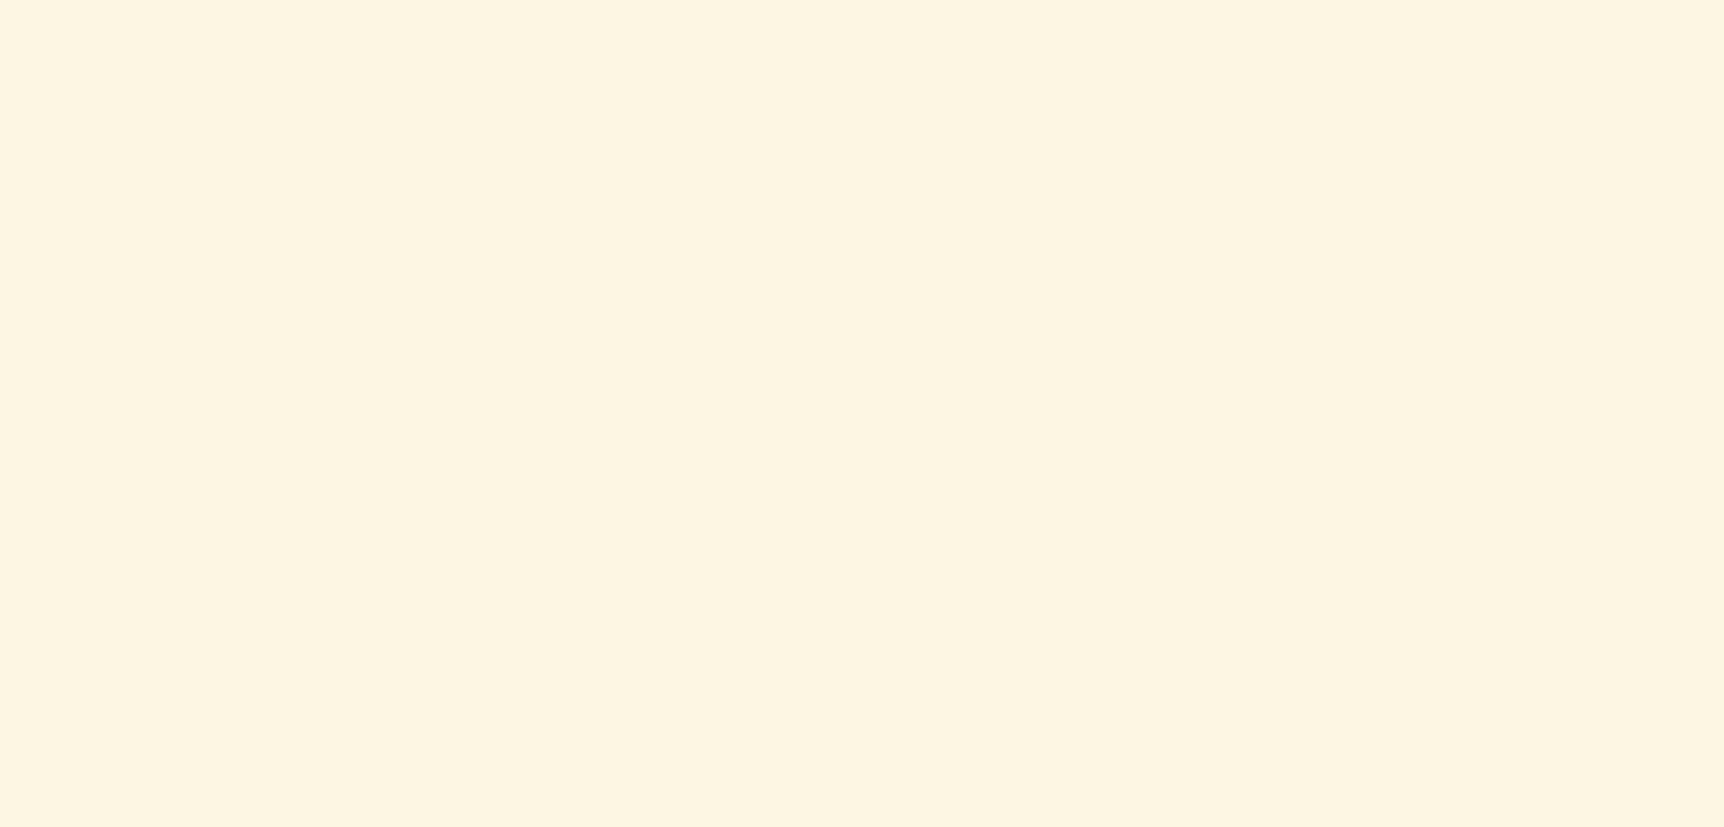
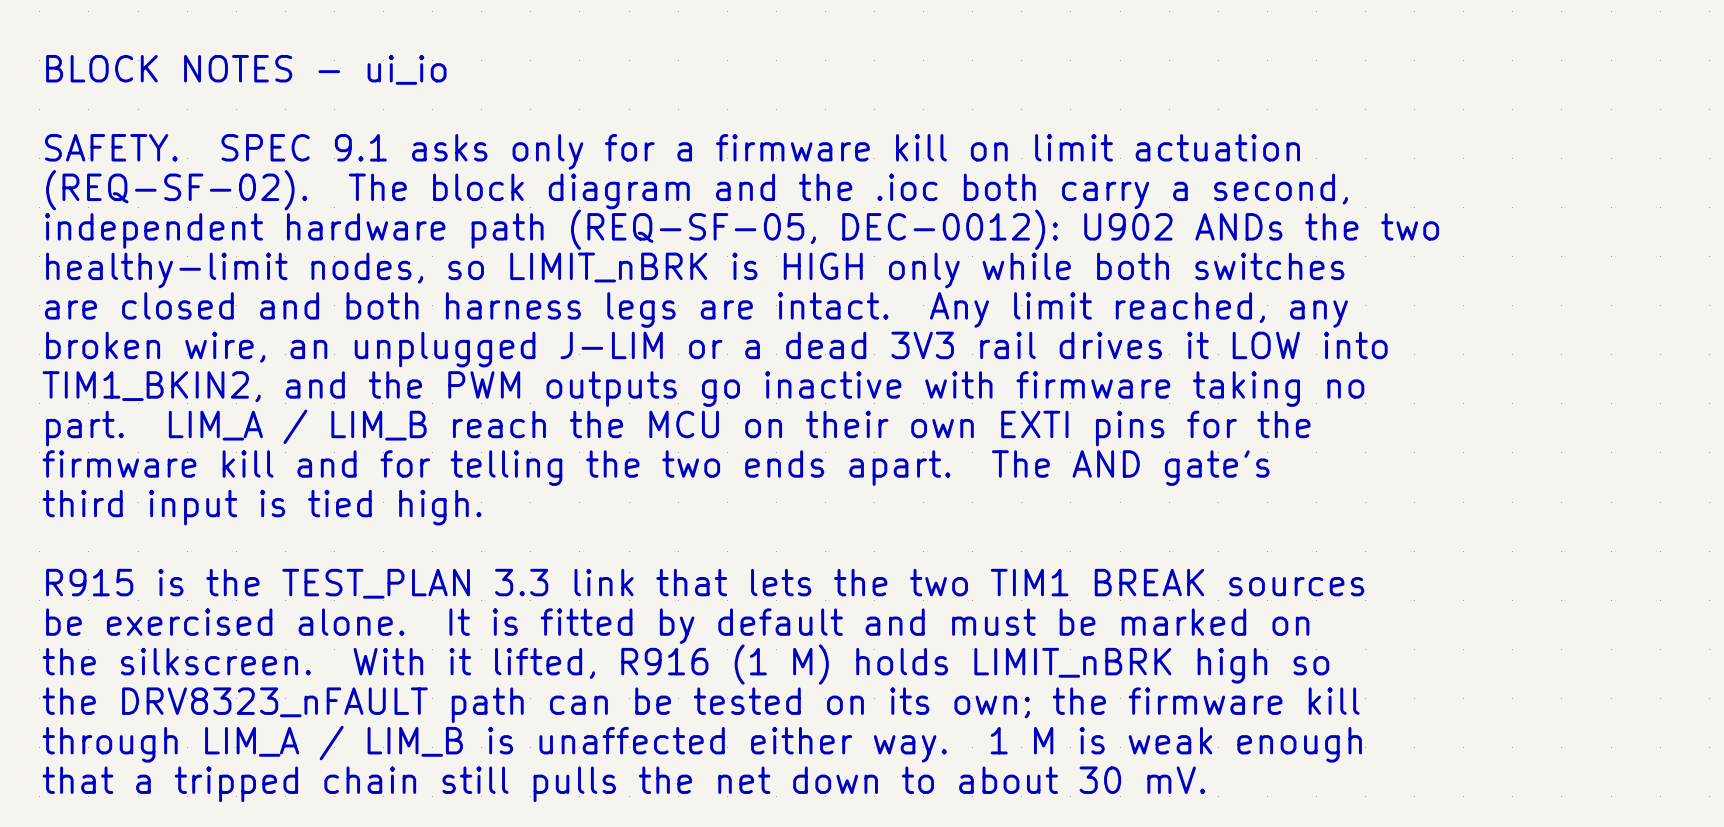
text: none -> BLOCK NOTES - ui_io (246, 69)
text: none -> SAFETY. SPEC 9.1 asks only for a firmware kill on limit actuation (672, 151)
text: none -> (REQ-SF-02). The block diagram and the .ioc both carry a second, (697, 190)
text: none -> independent hardware path (REQ-SF-05, DEC-0012): U902 ANDs the two (742, 229)
text: none -> healthy-limit nodes, so LIMIT_nBRK is HIGH only while both switches (695, 270)
text: none -> are closed and both harness legs are intact. Any limit reached, any (696, 309)
text: none -> broken wire, an unplugged J-LIM or a dead 3V3 rail drives it LOW into (716, 349)
text: none -> TIM1_BKIN2, and the PWM outputs go inactive with firmware taking no (703, 389)
text: none -> part. LIM_A / LIM_B reach the MCU on their own EXTI pins for the (678, 427)
text: none -> firmware kill and for telling the two ends apart. The AND gate's (656, 468)
text: none -> third input is tied high. (262, 507)
text: none -> R915 is the TEST_PLAN 3.3 link that lets the two TIM1 BREAK sources (705, 583)
text: none -> be exercised alone. It is fitted by default and must be marked on (677, 626)
text: none -> the silkscreen. With it lifted, R916 (1 M) holds LIMIT_nBRK high so (685, 664)
text: none -> the DRV8323_nFAULT path can be tested on its own; the firmware kill (701, 705)
text: none -> through LIM_A / LIM_B is unaffected either way. 1 M is weak enough (702, 744)
text: none -> that a tripped chain still pulls the net down to about 30 mV. (623, 784)

